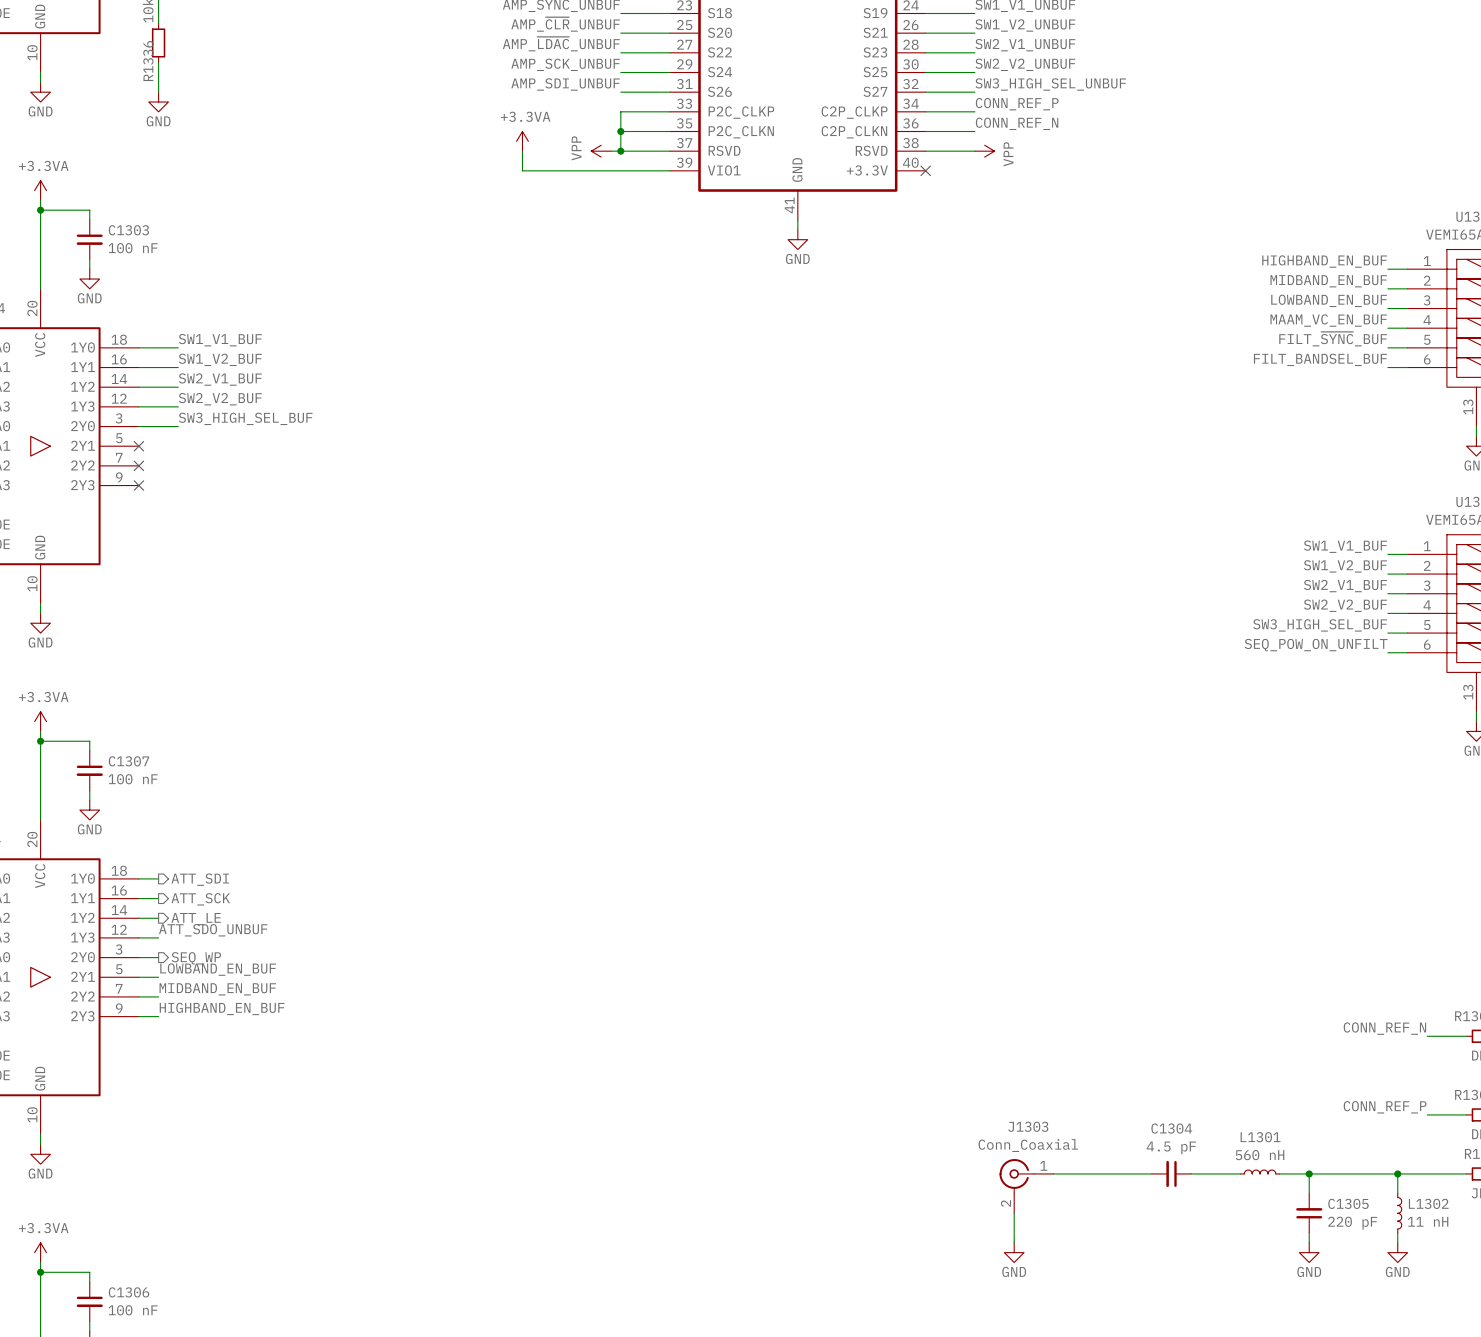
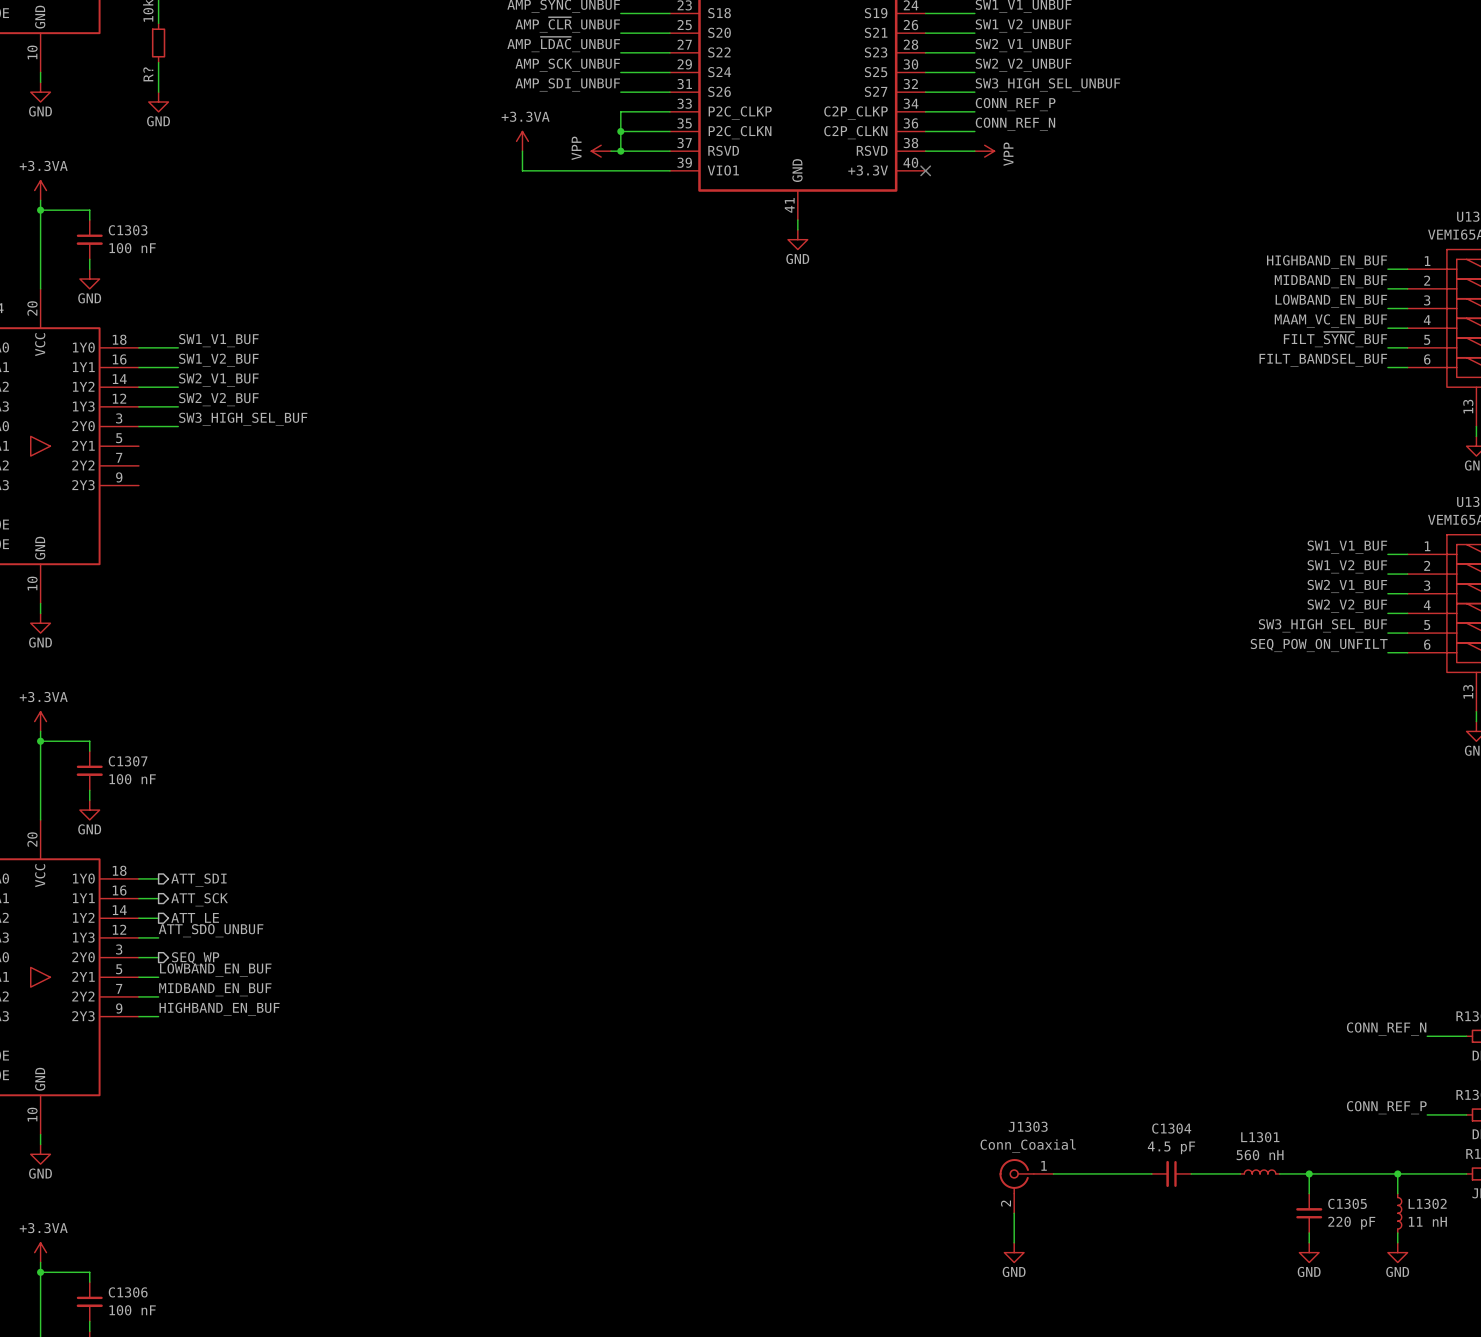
R1336 name: R1336 (148, 61) -> R? (148, 74)
no-connect mark: (138, 446) -> none
no-connect mark: (138, 465) -> none
no-connect mark: (138, 485) -> none

